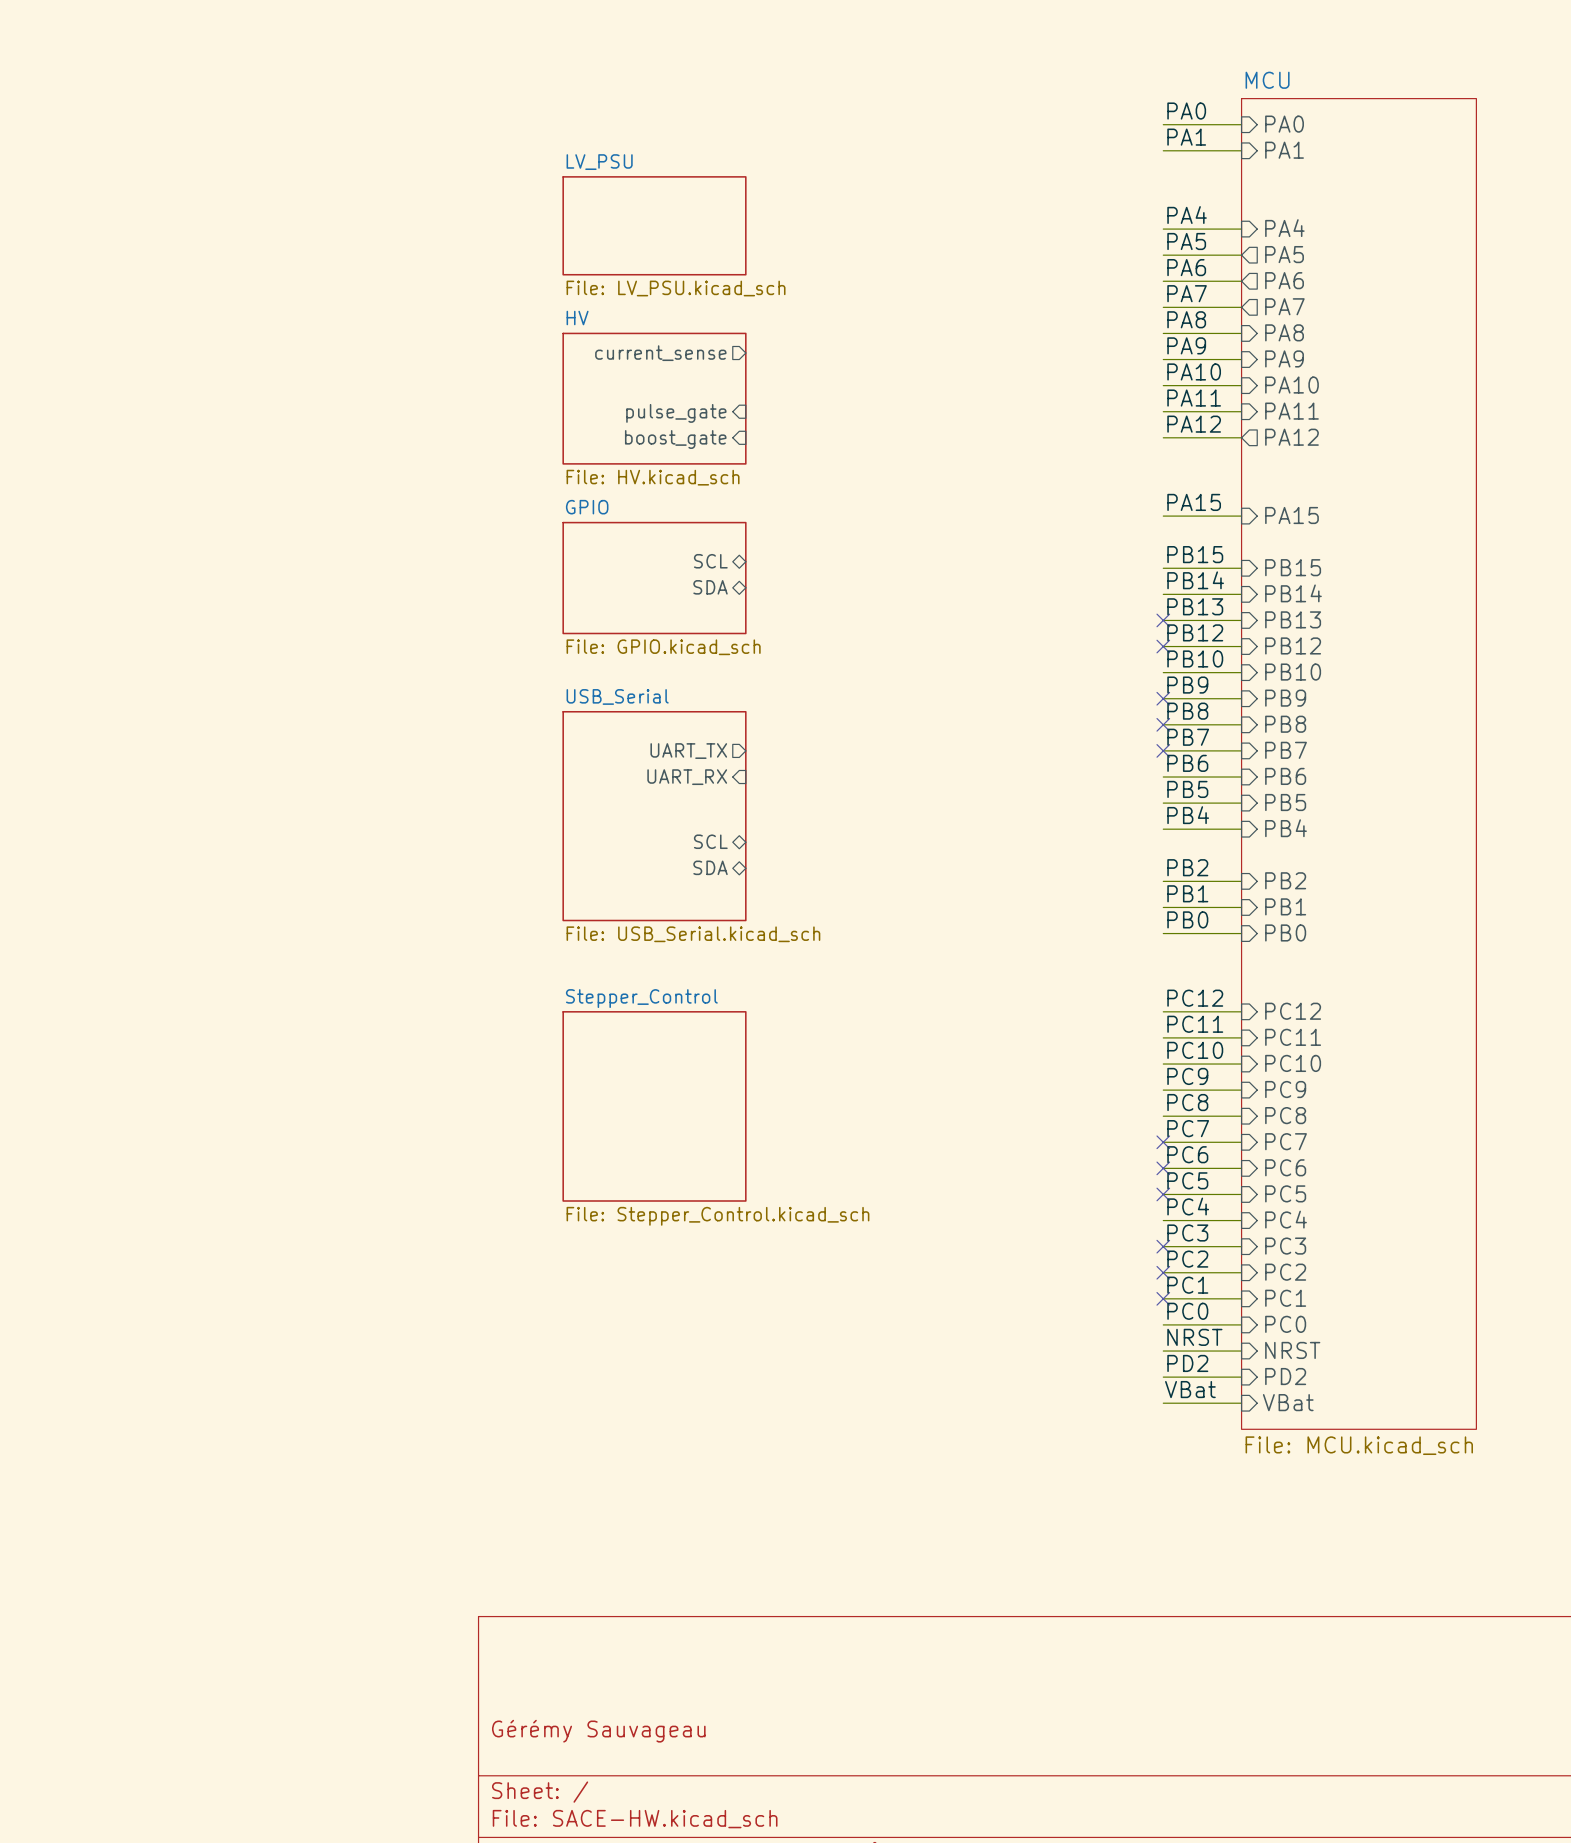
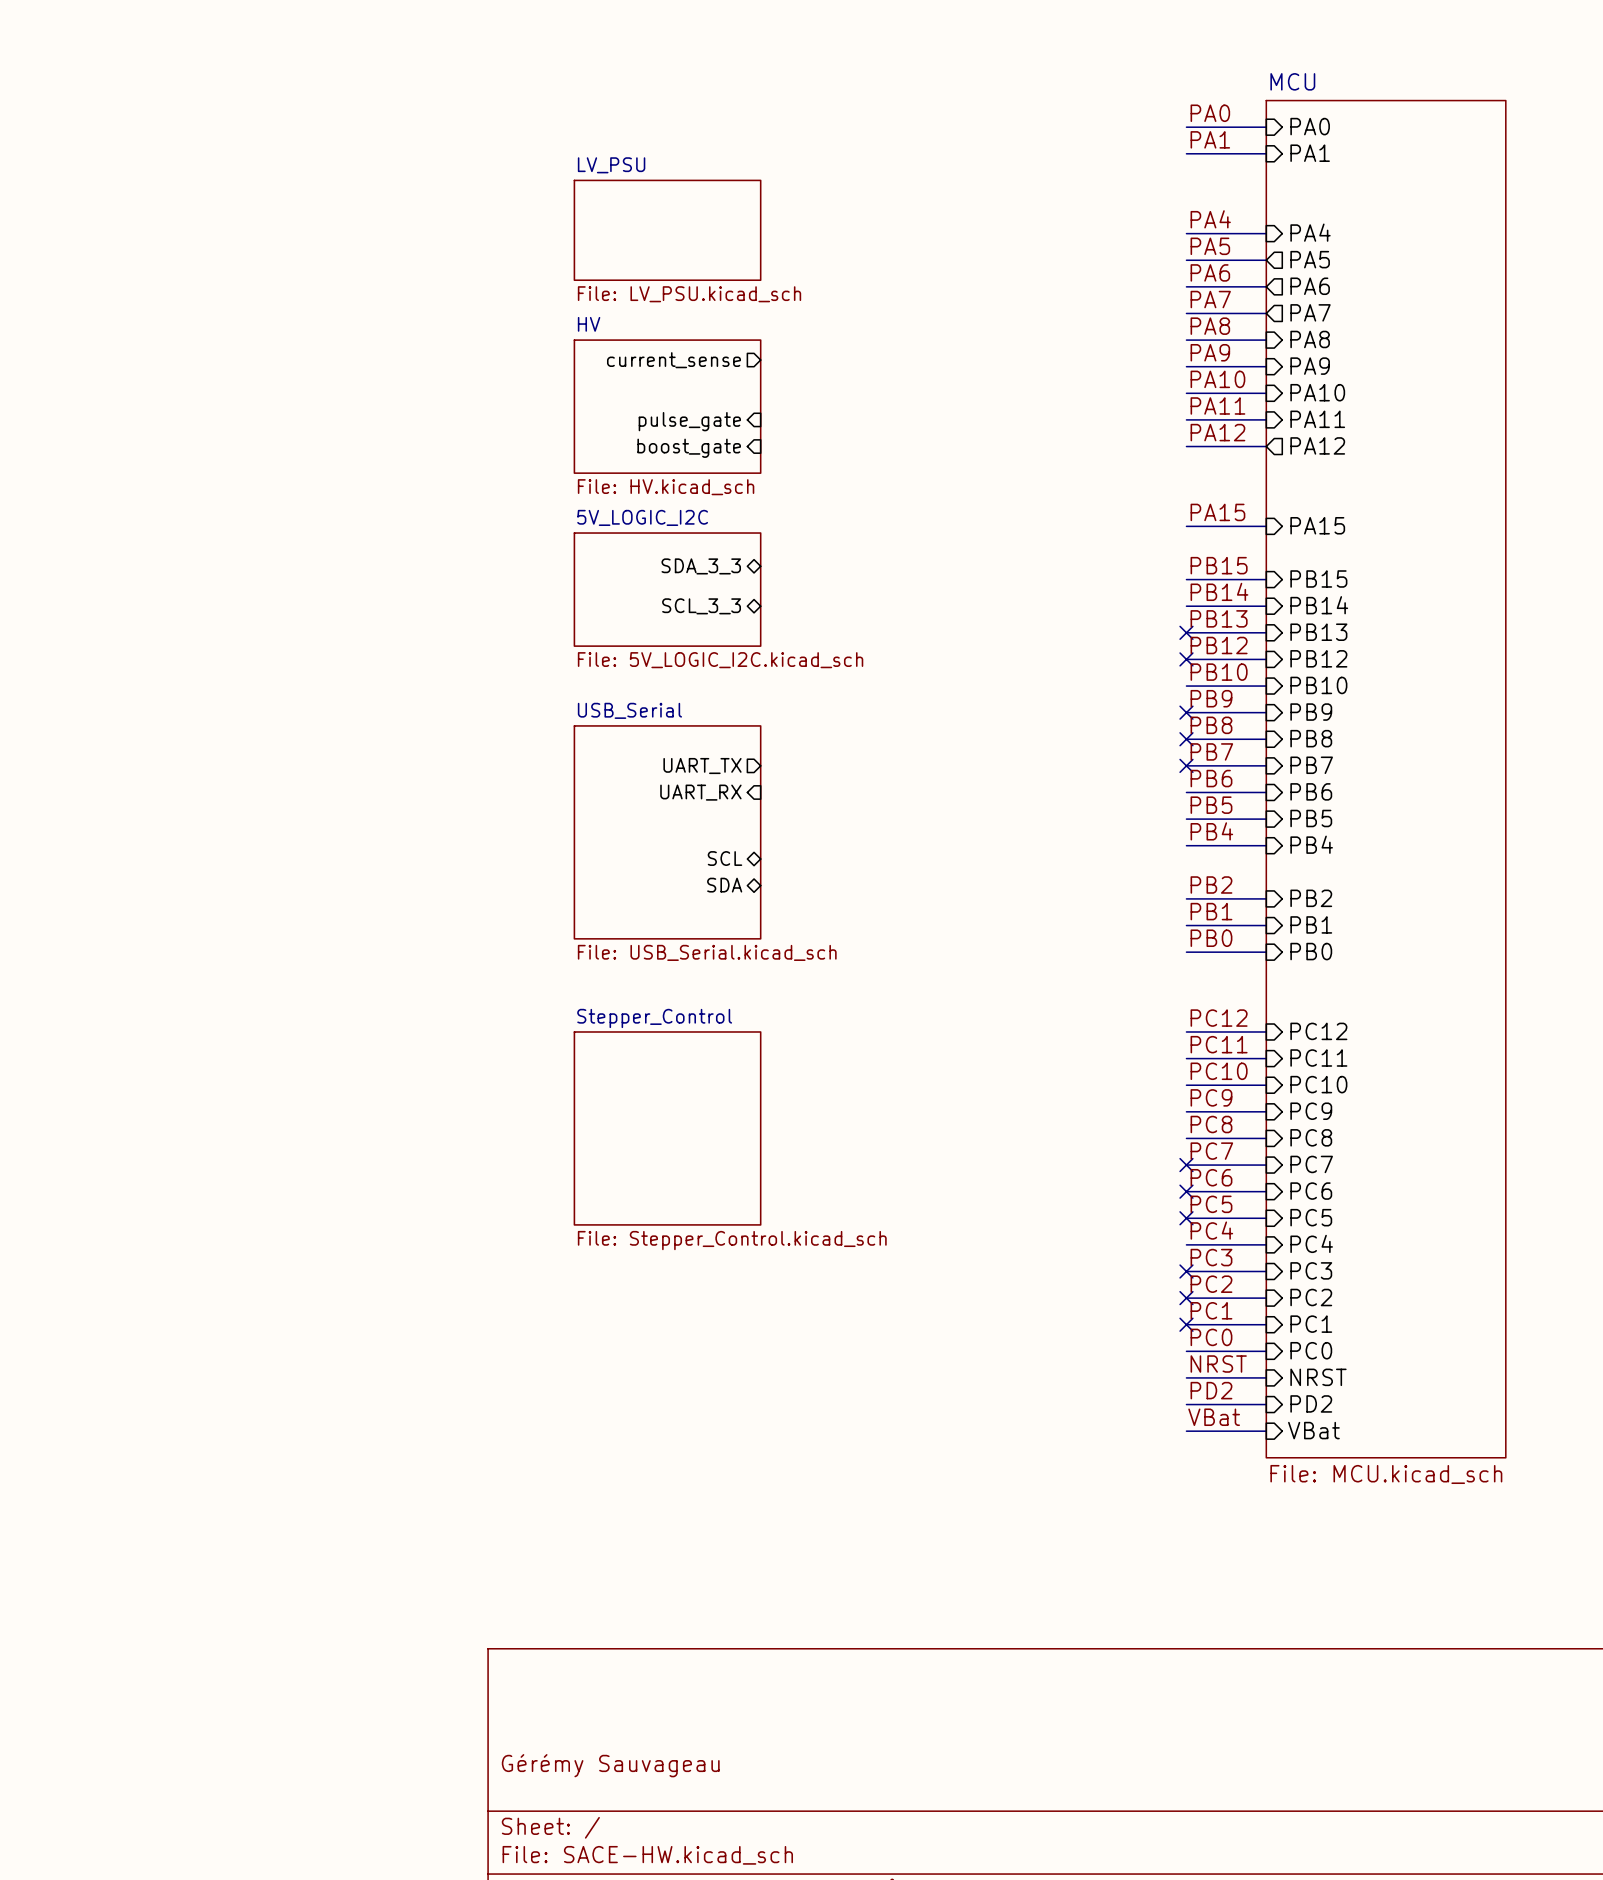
sheet GPIO name: GPIO (587, 507) -> 5V_LOGIC_I2C (642, 517)
sheet pin: SCL (710, 561) -> SDA_3_3 (701, 566)
sheet pin: SDA (710, 587) -> SCL_3_3 (701, 606)
sheet GPIO value: File: GPIO.kicad_sch (663, 647) -> File: 5V_LOGIC_I2C.kicad_sch (720, 660)

